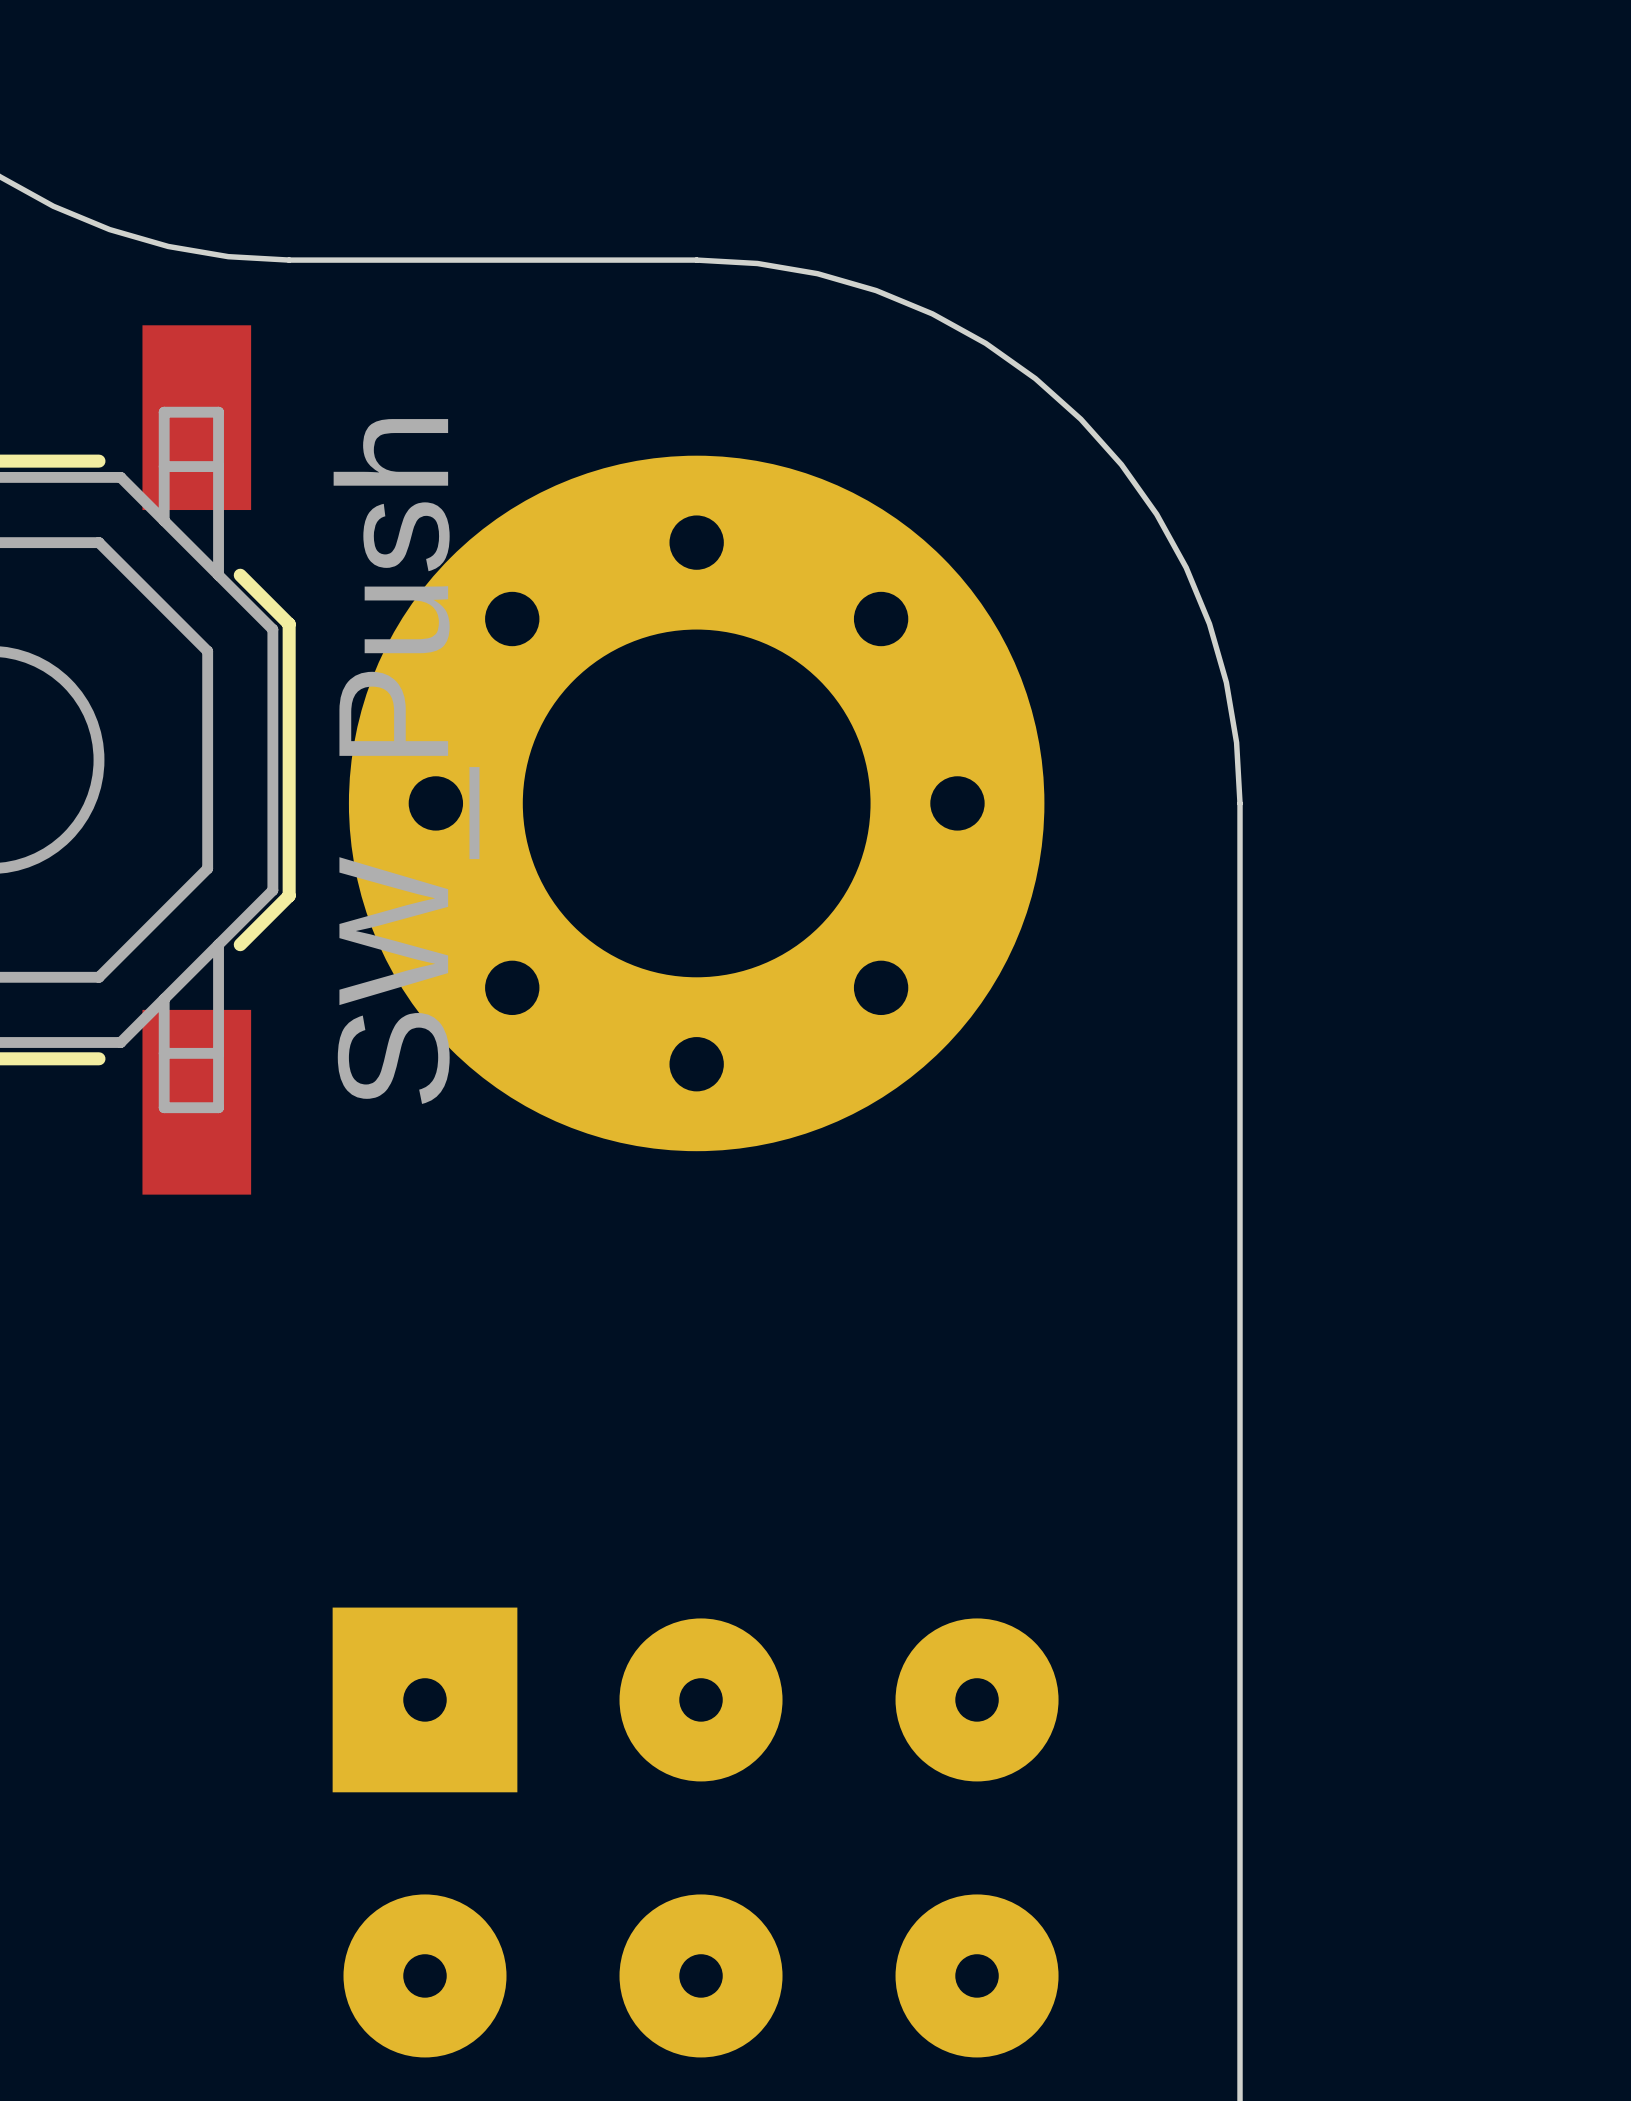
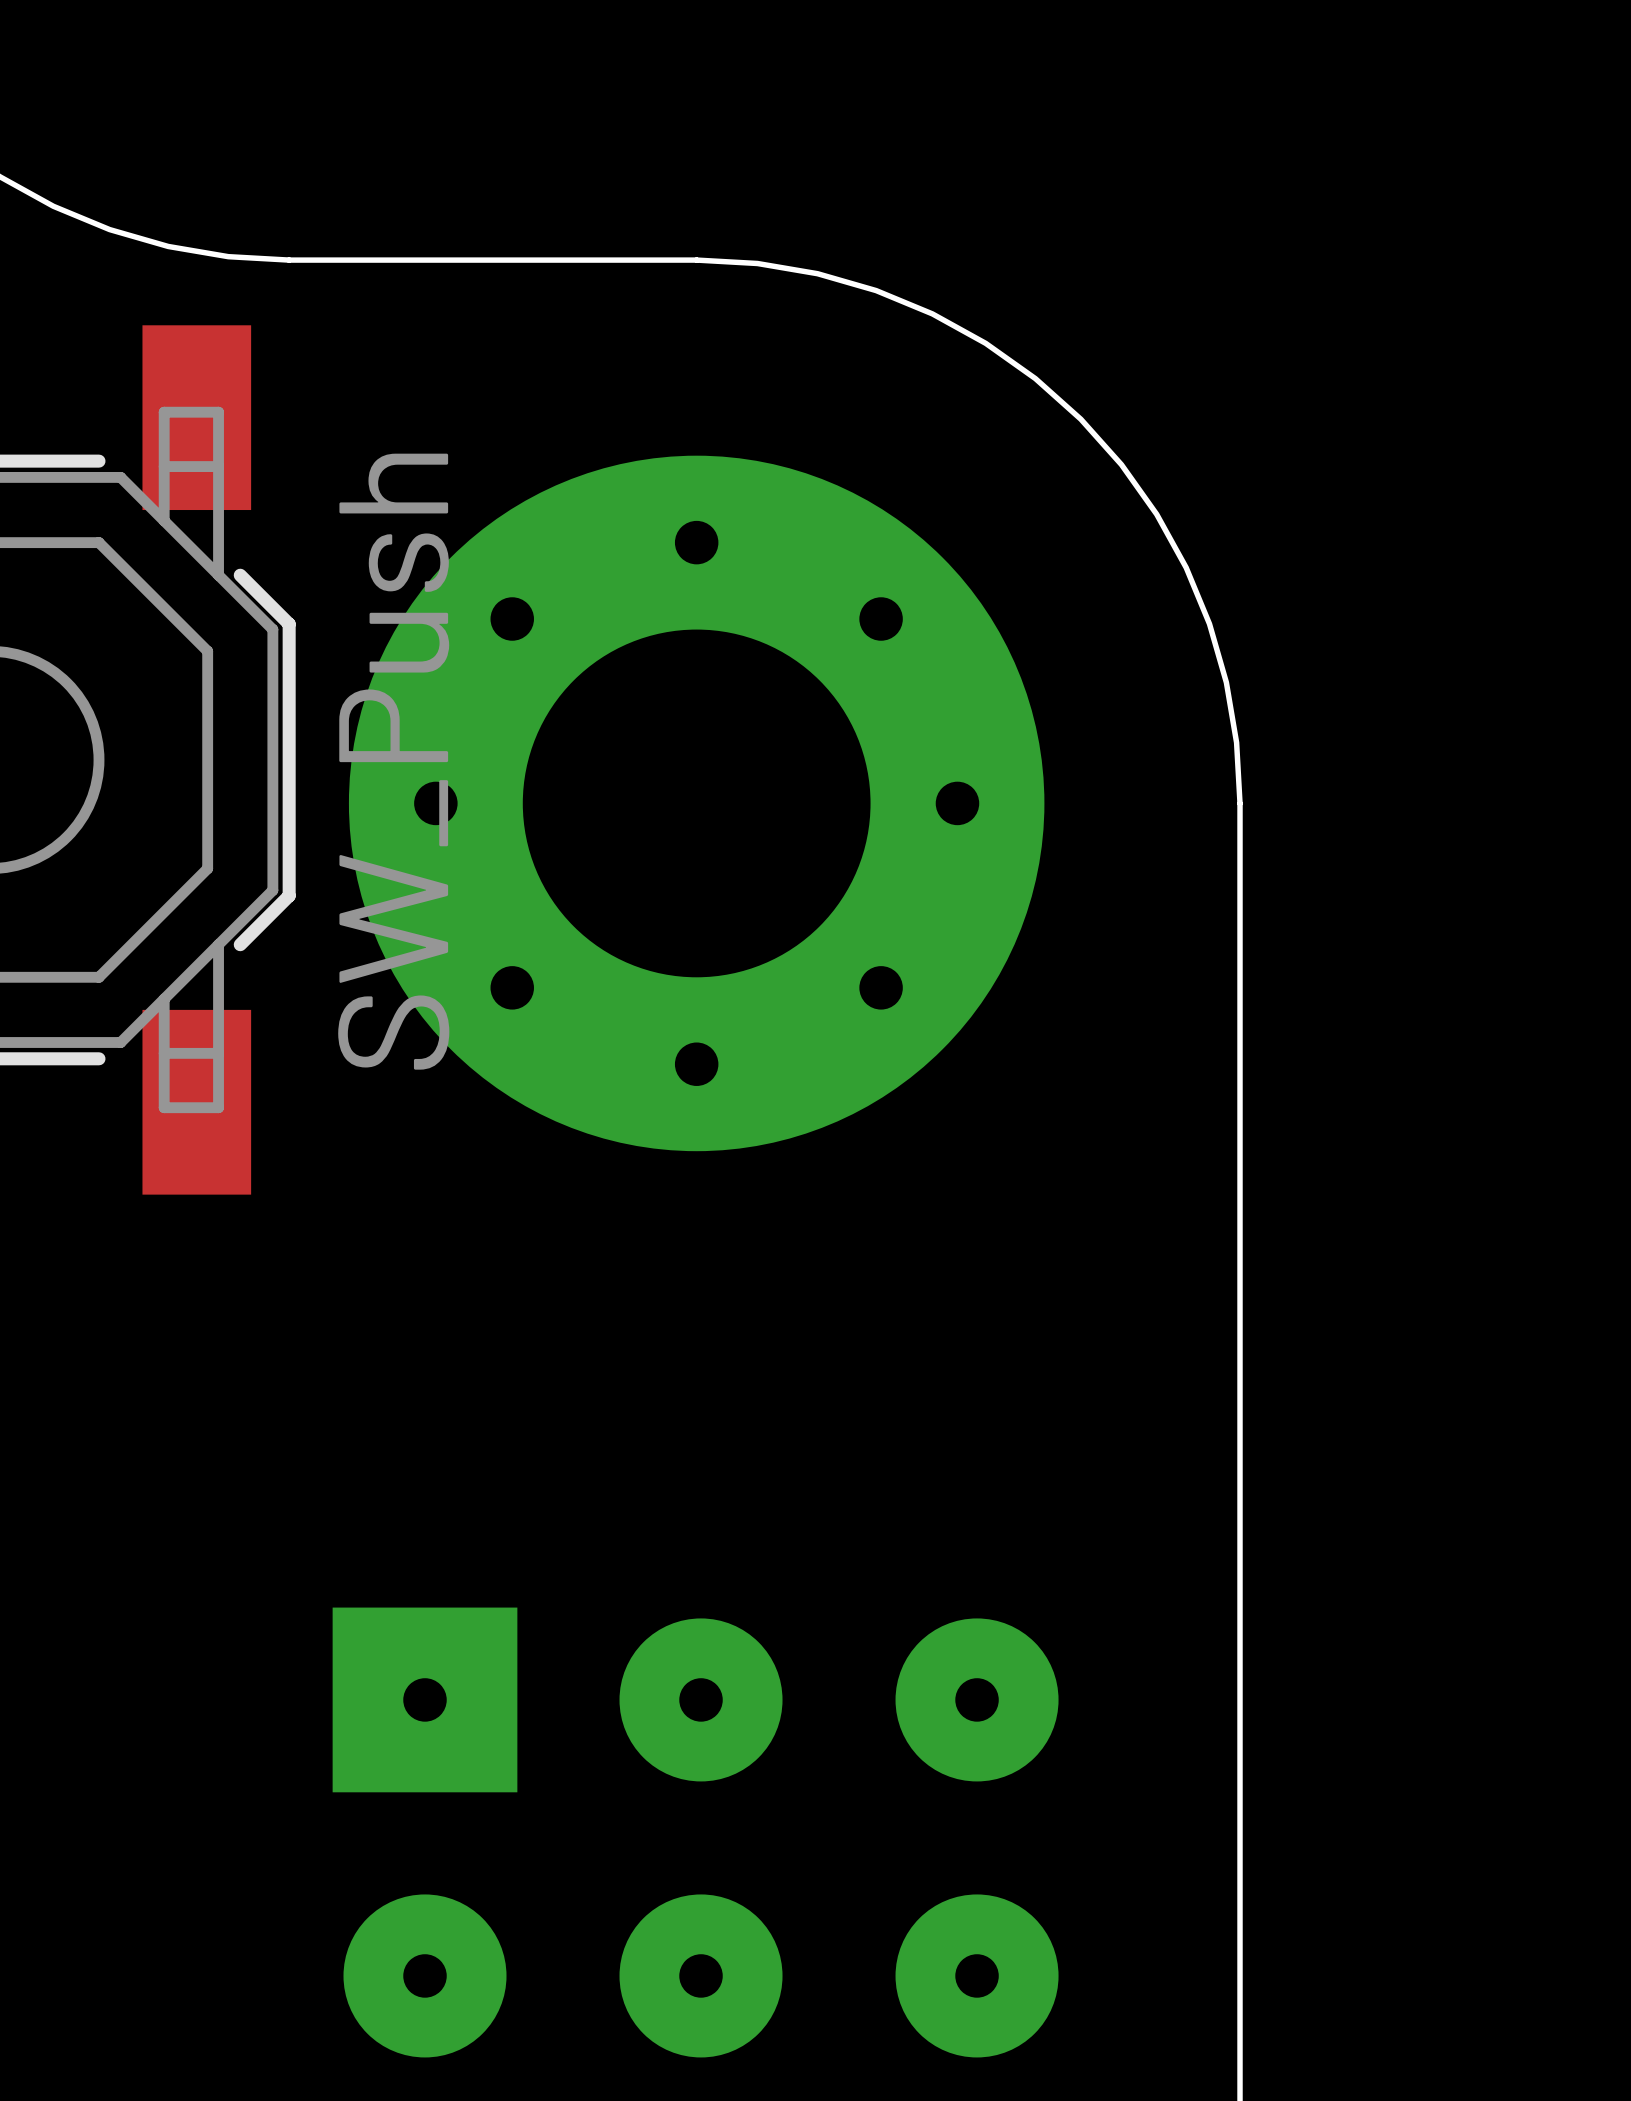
part footprint: [348, 455, 1045, 1152] -> [348, 455, 1045, 1152]

